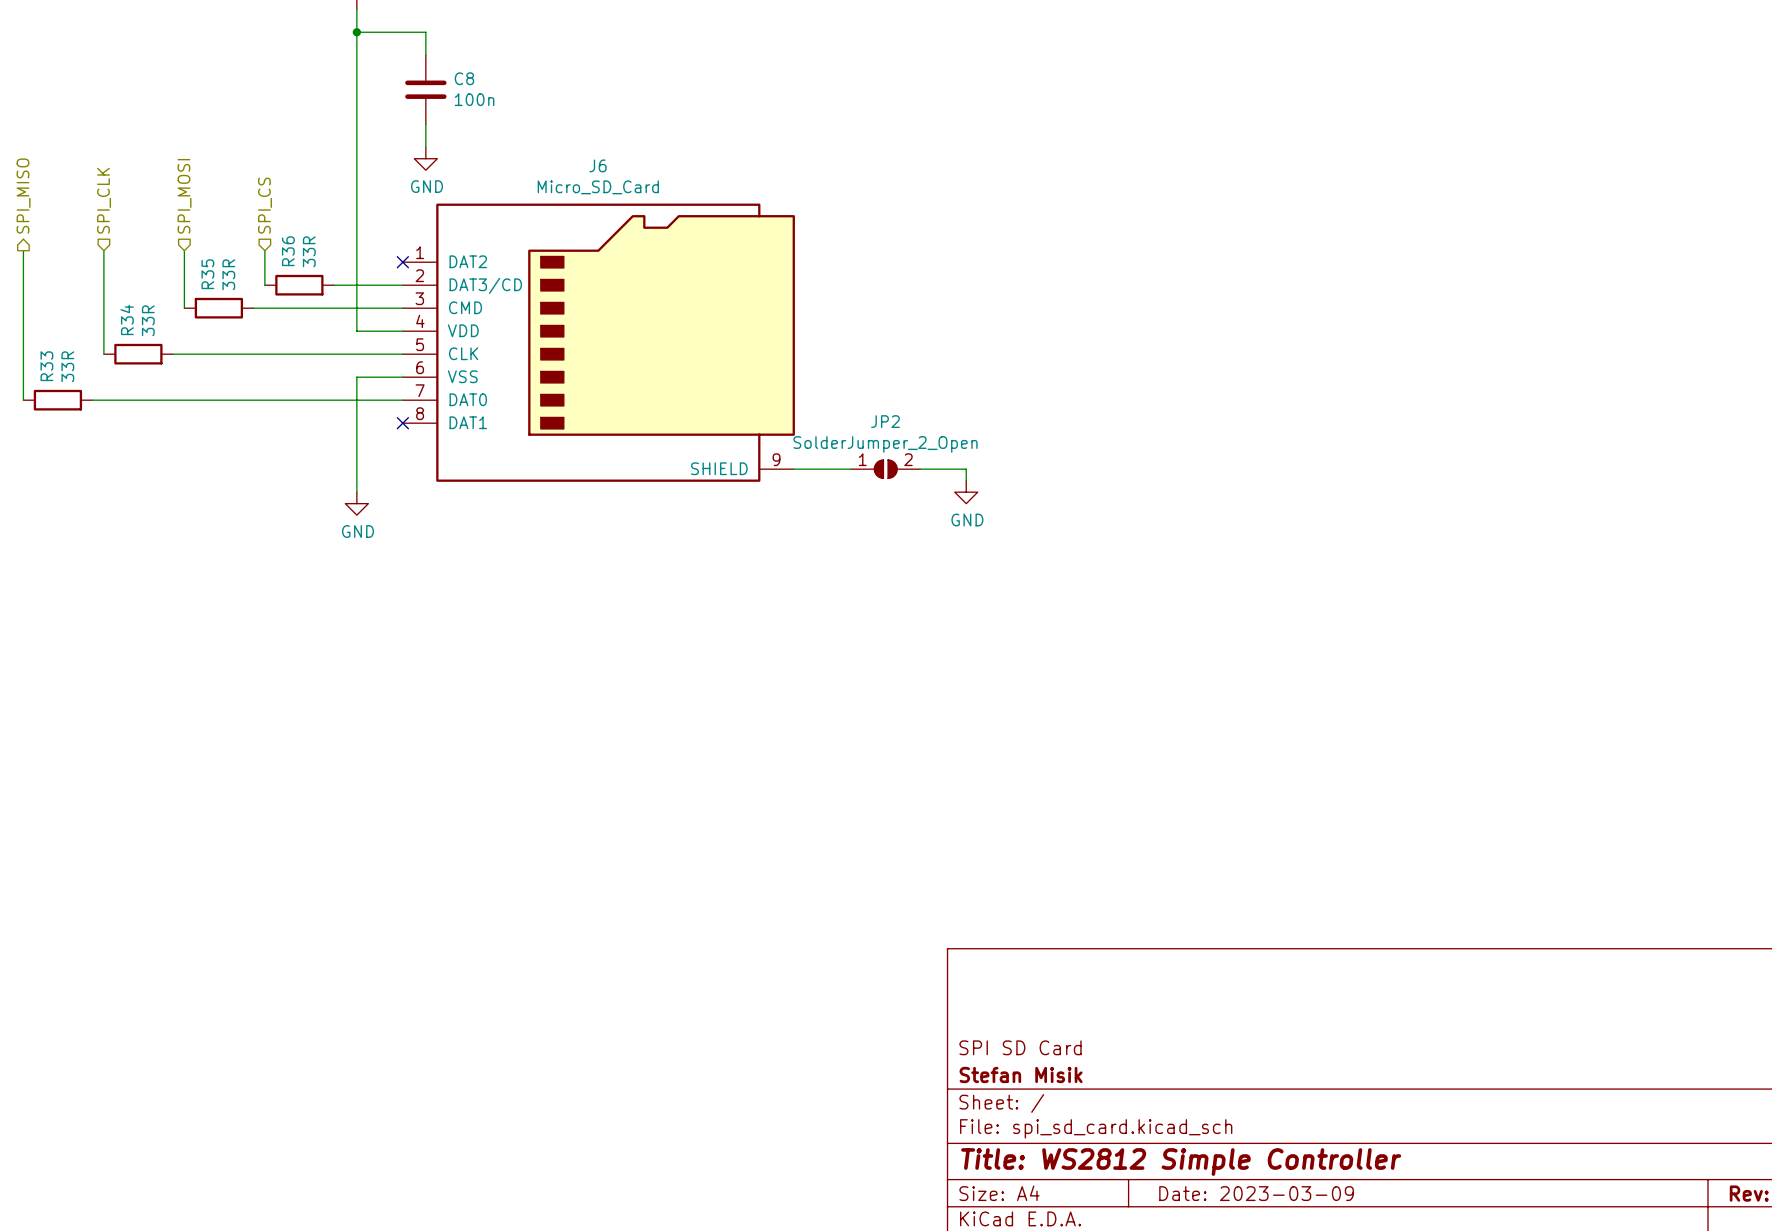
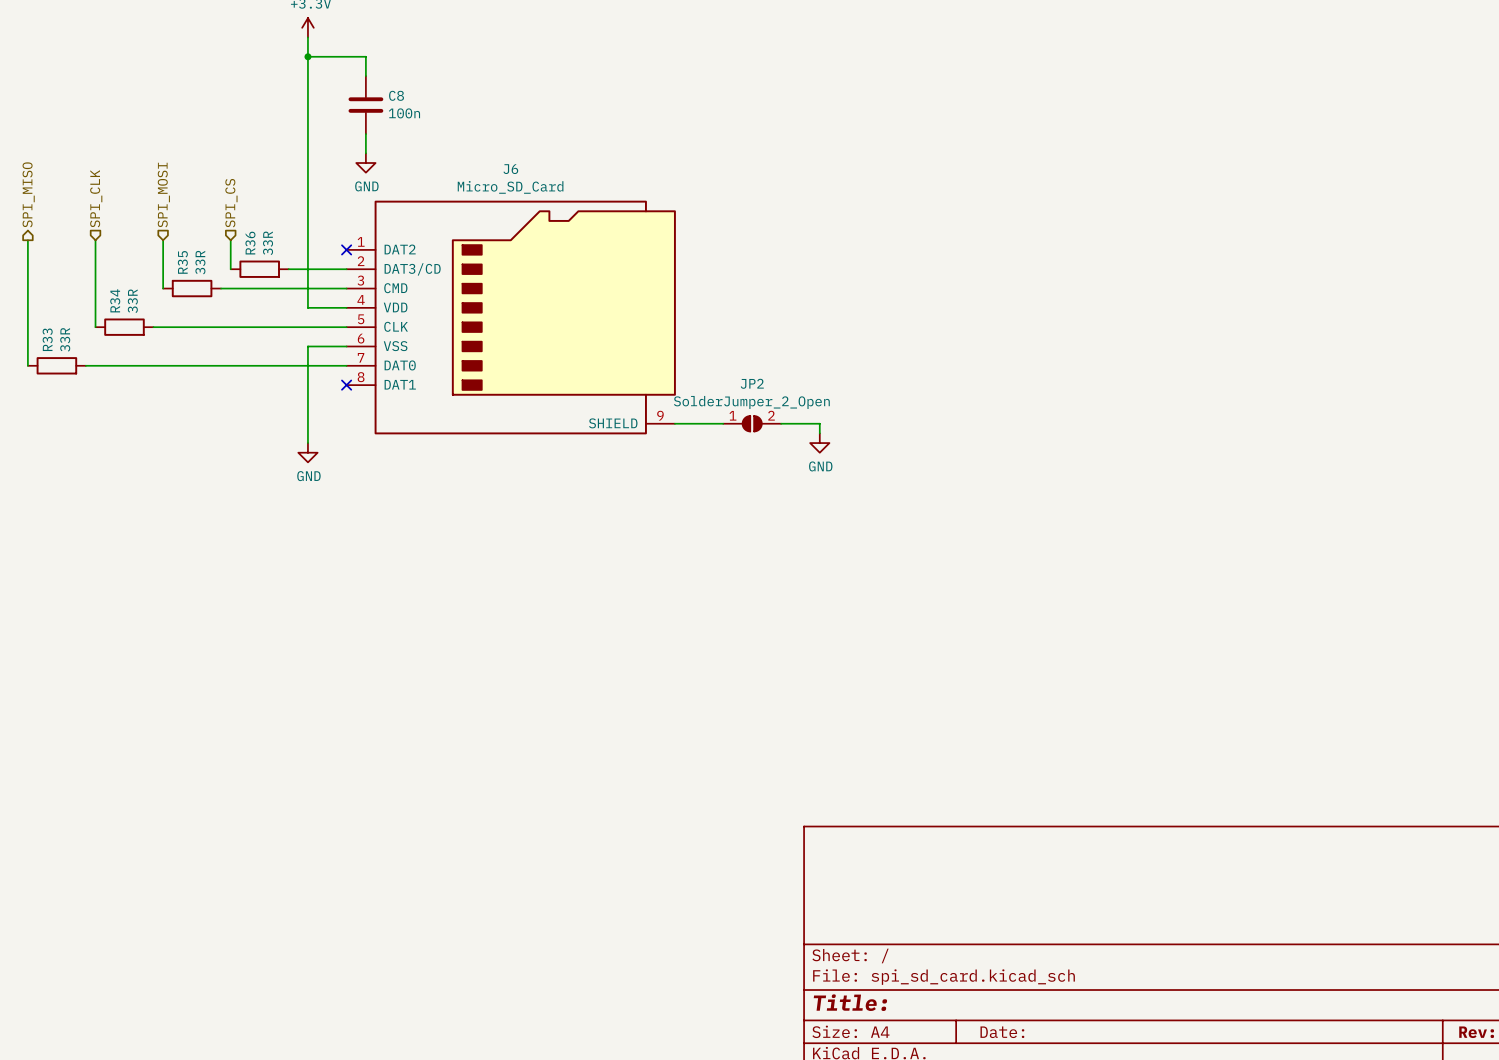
title block: SPI SD Card (1020, 1047) -> none
title block: Stefan Misik (1021, 1074) -> none
title block: Title: WS2812 Simple Controller (1181, 1162) -> Title: (850, 1002)
title block: Date: 2023-03-09 (1256, 1193) -> Date: (1002, 1032)

